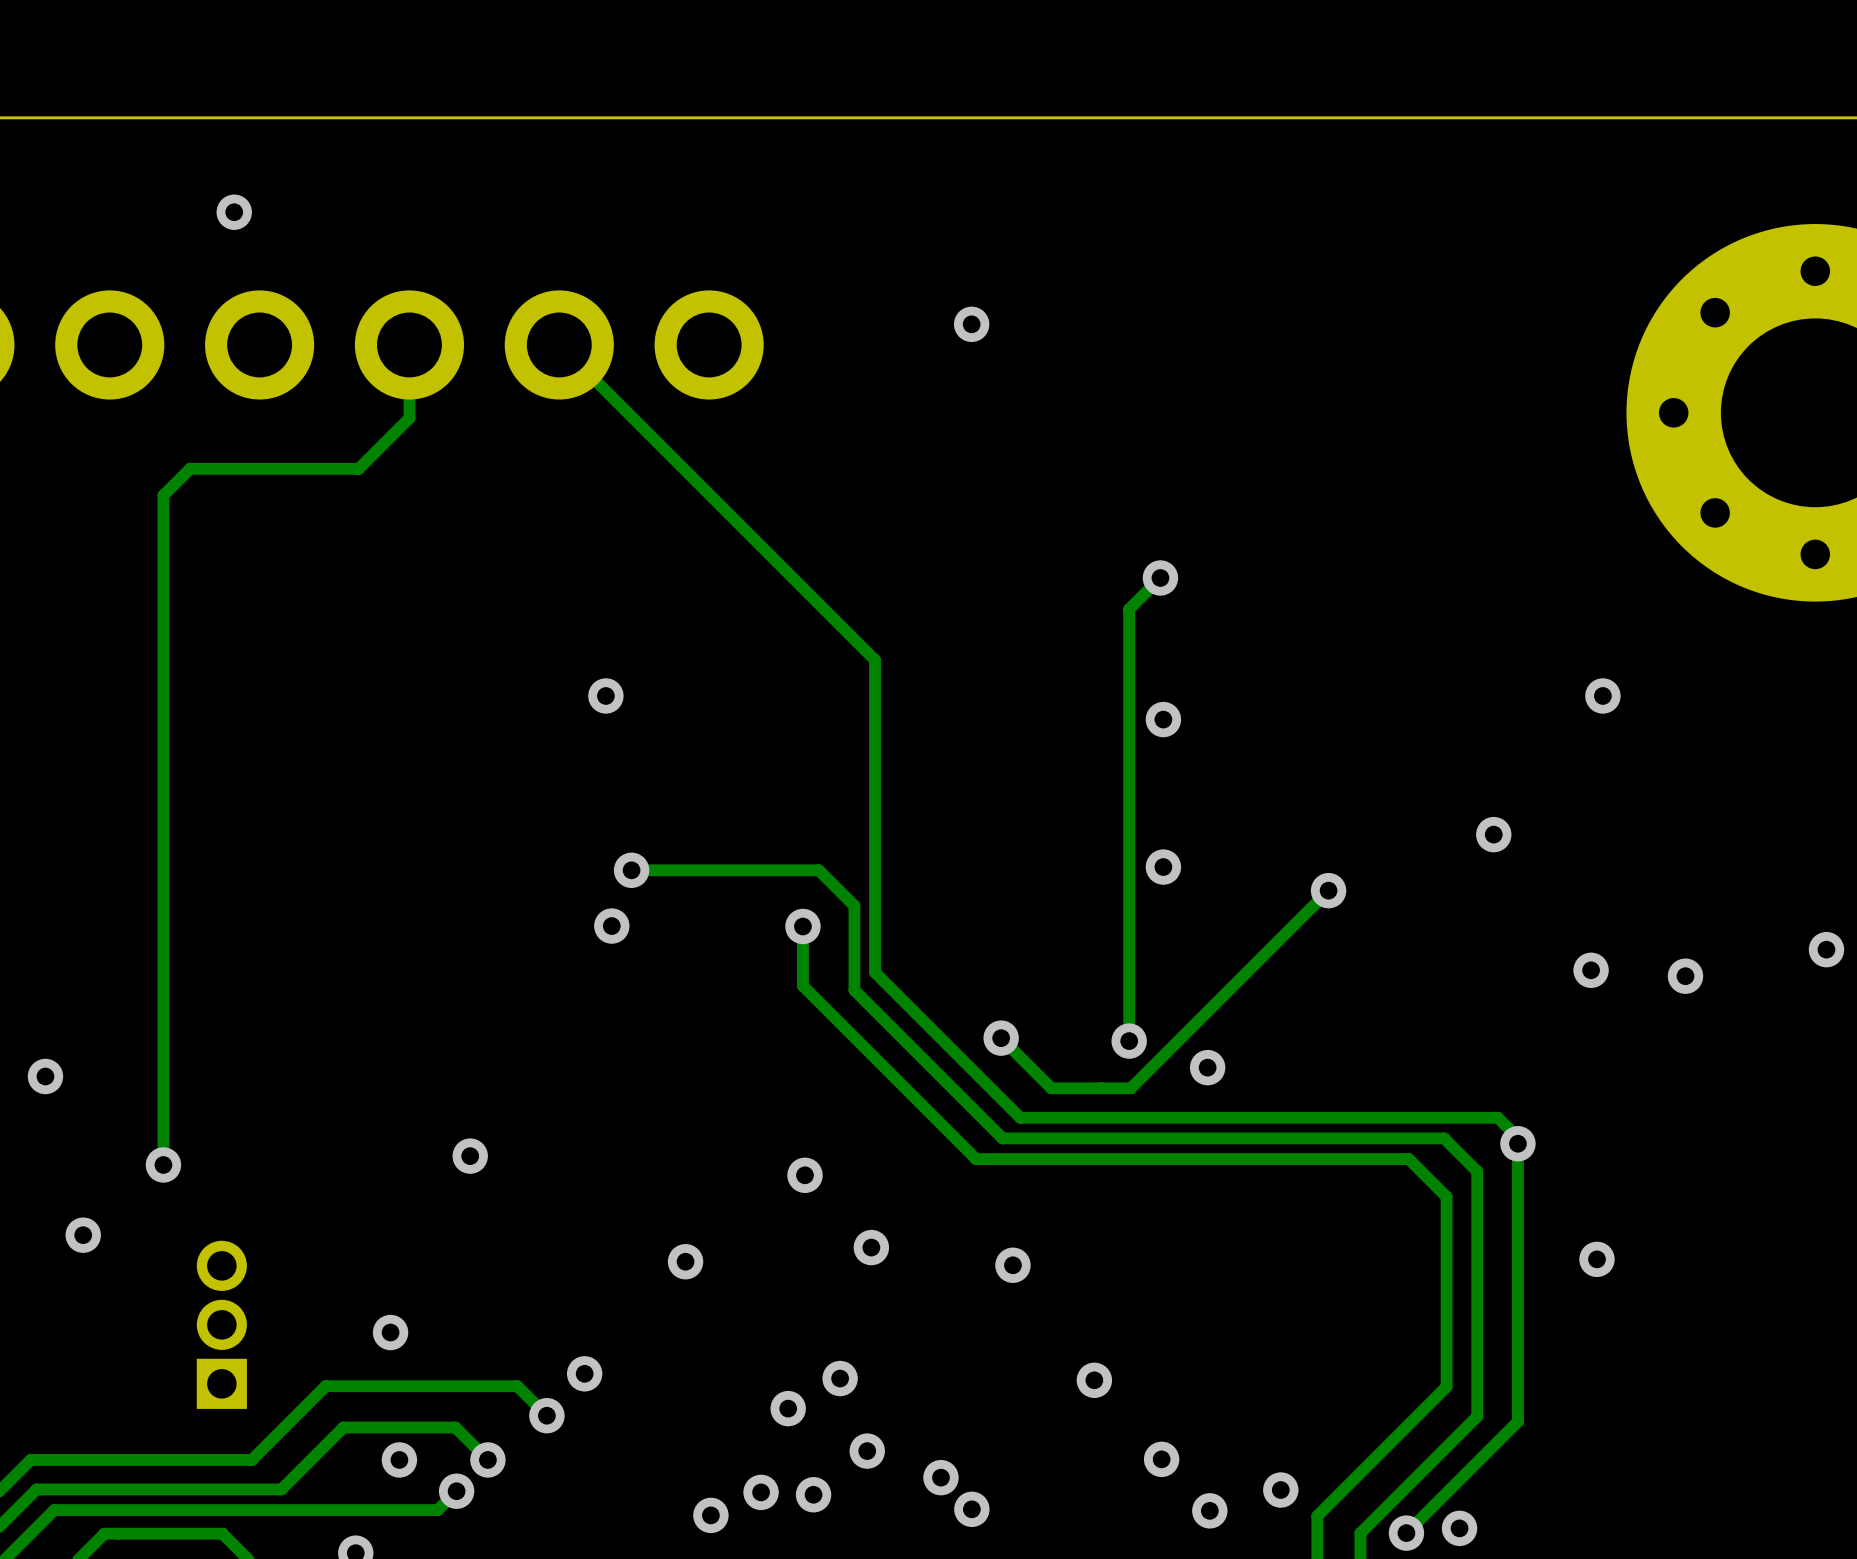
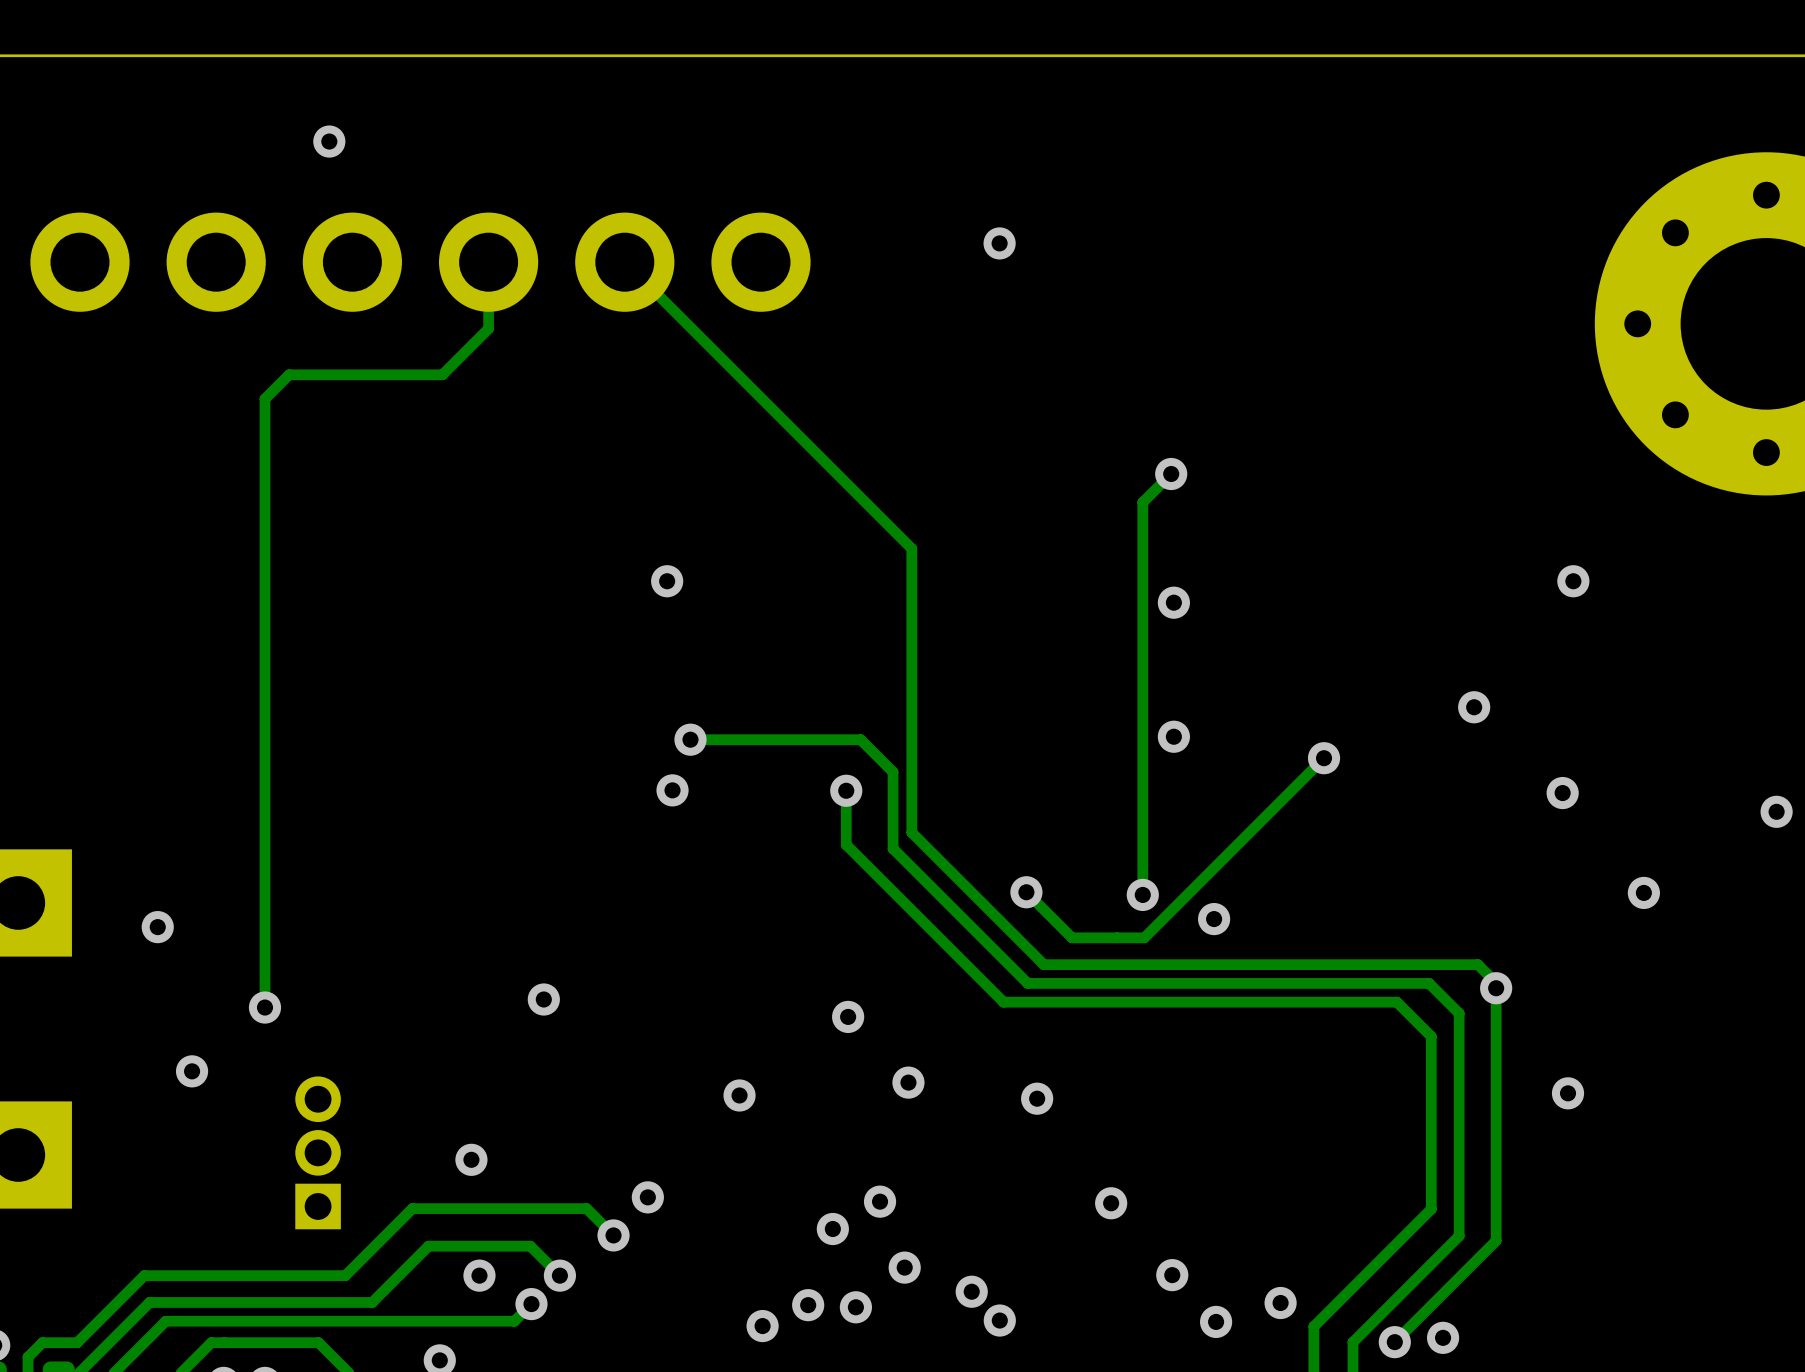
via position: (1591, 970) -> (1562, 793)
via: (1685, 976) -> none
via: none -> (1643, 892)

